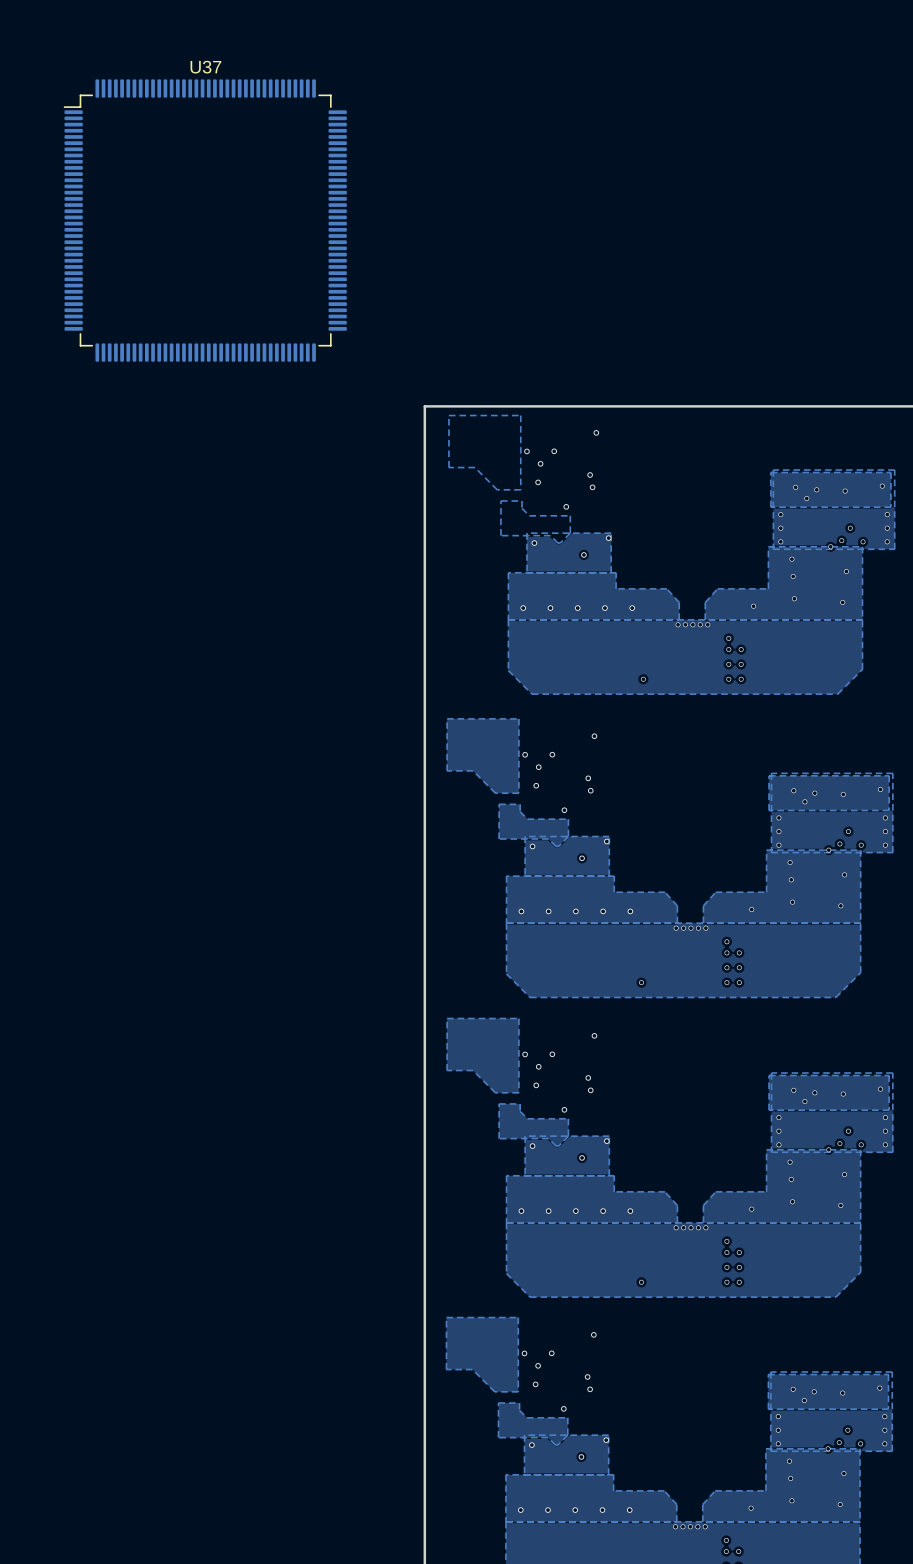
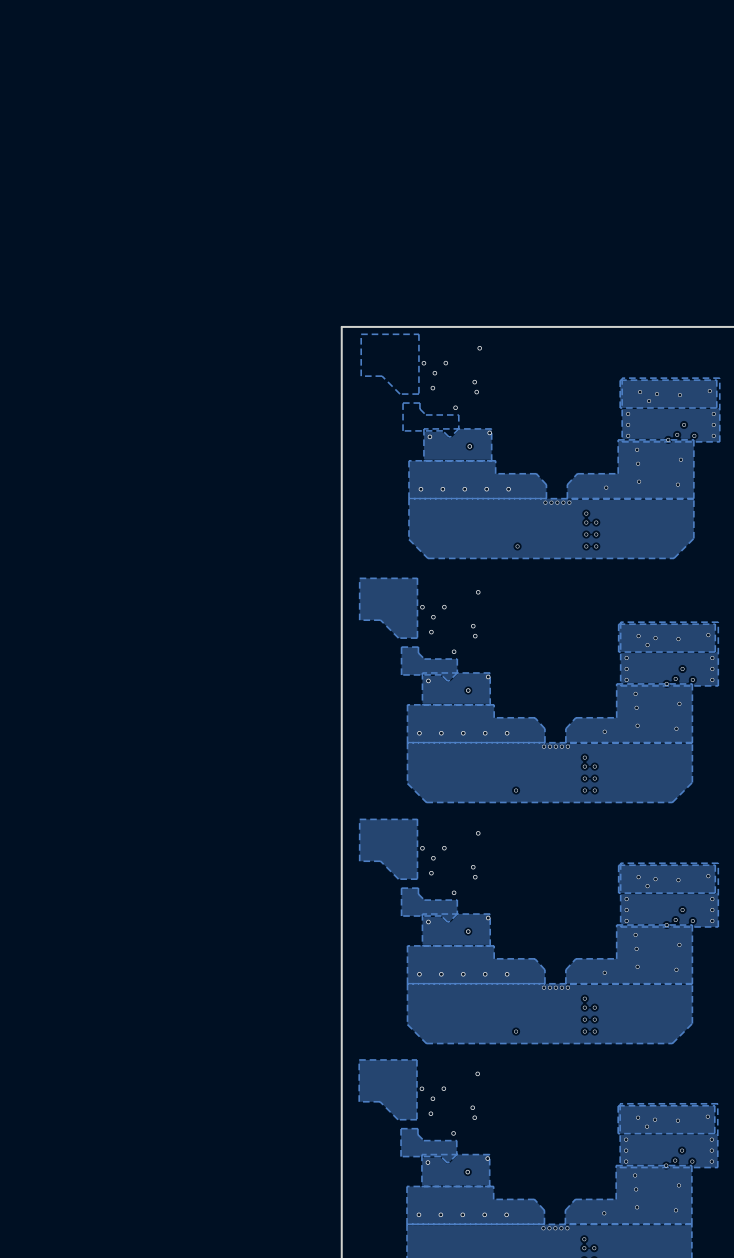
U37: (205, 220) -> none

